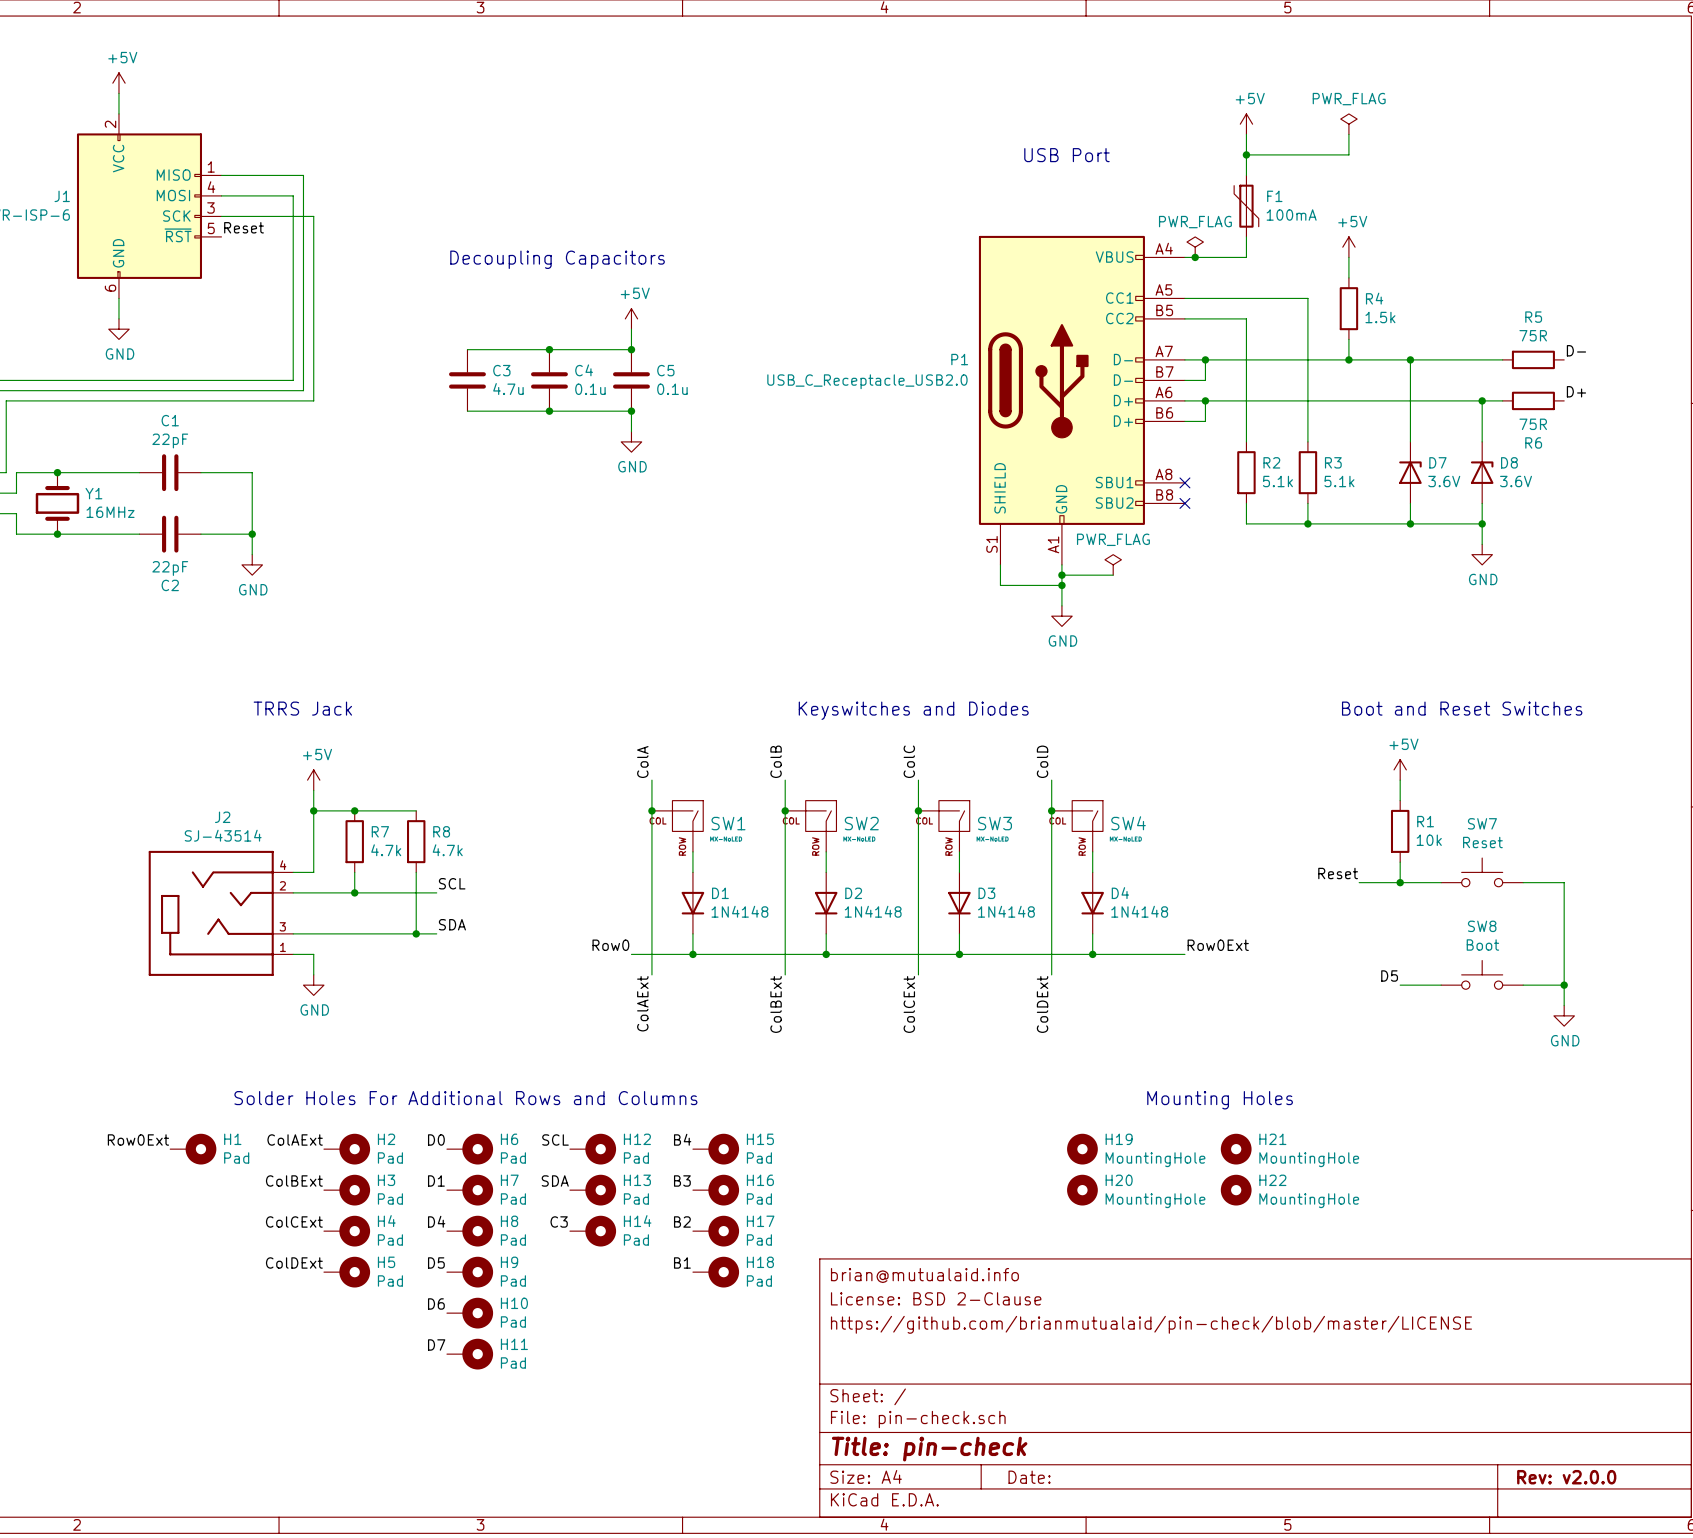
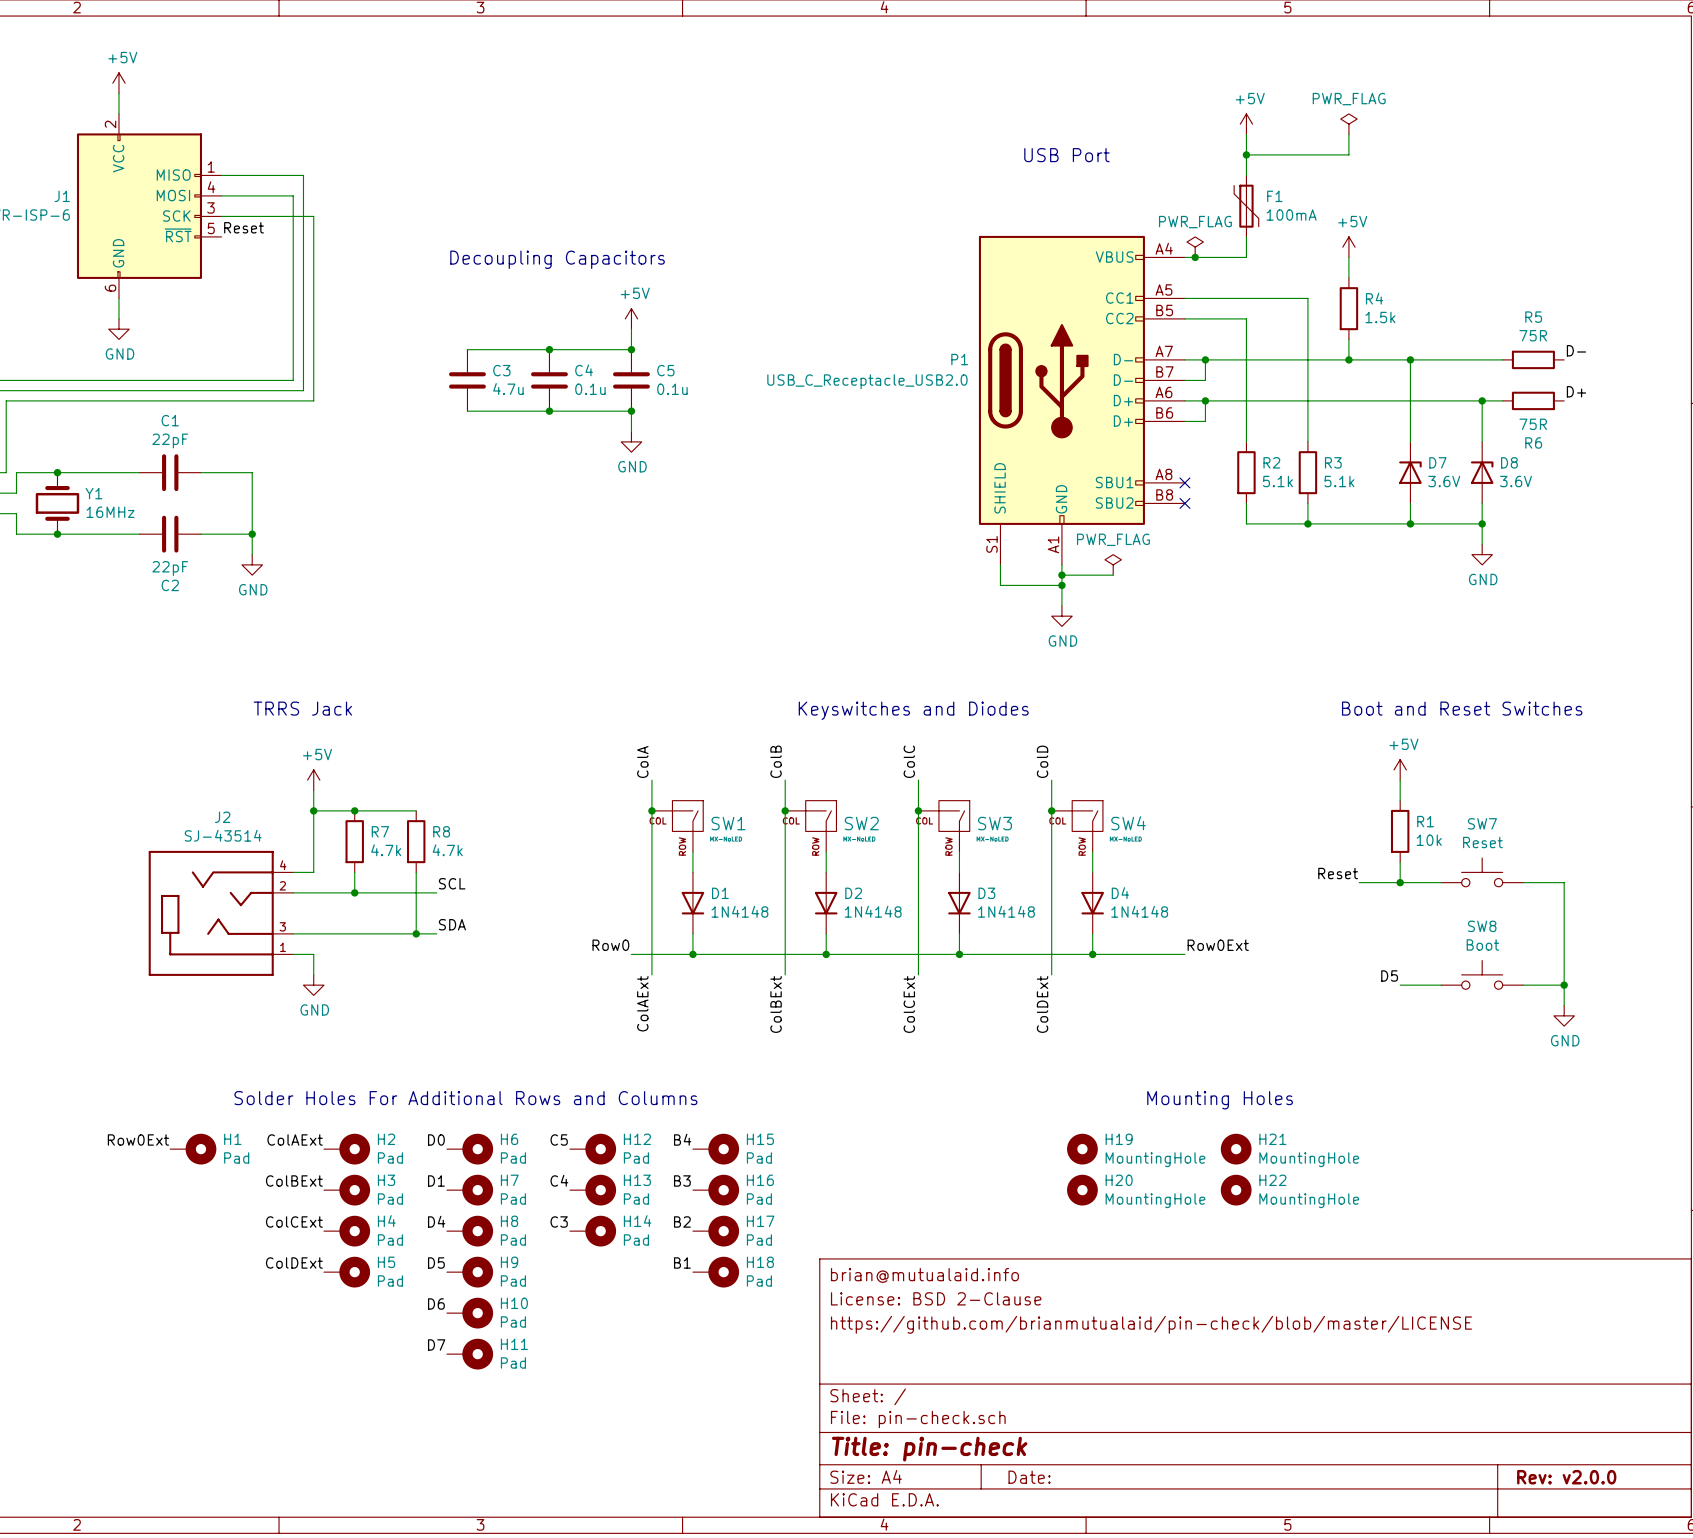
label: SCL (555, 1139) -> C5 (559, 1139)
label: SDA (555, 1180) -> C4 (559, 1180)

